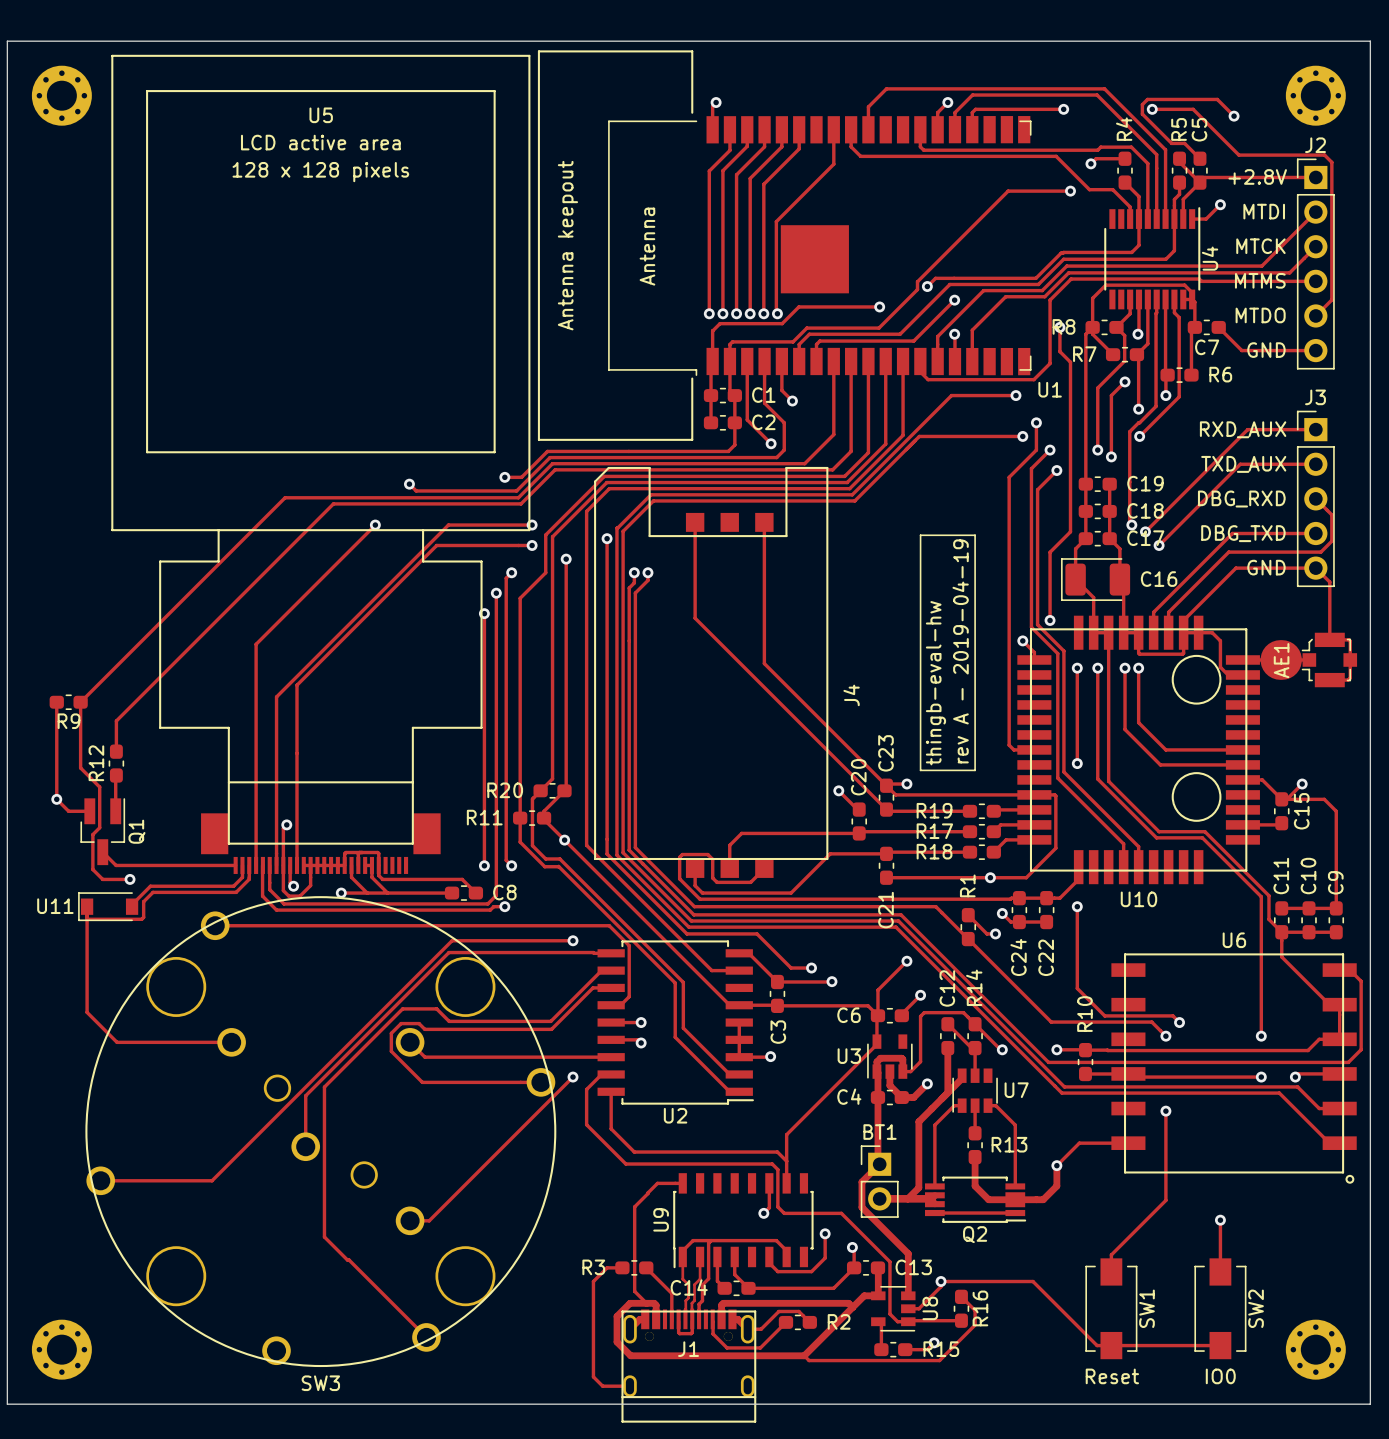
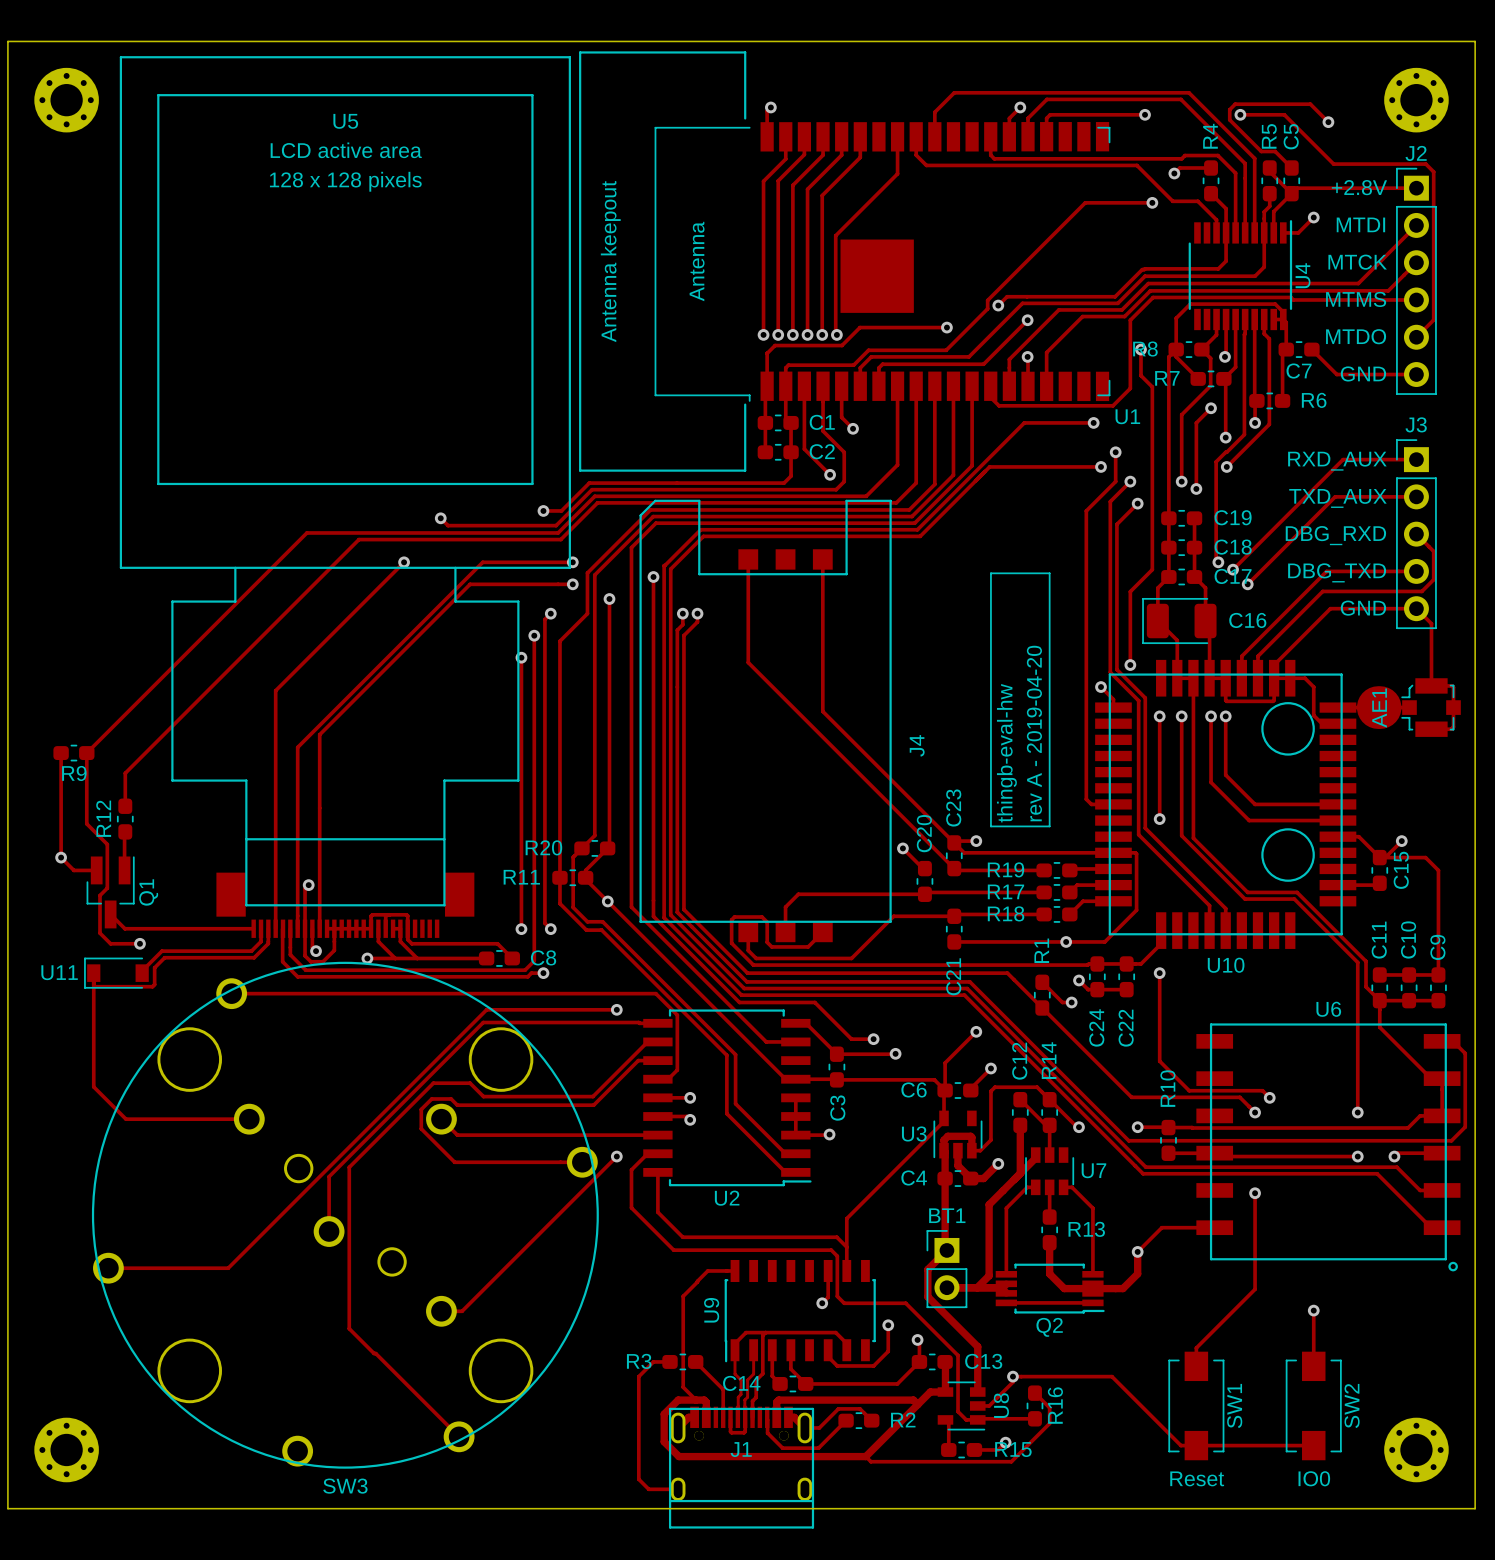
text: rev A - 2019-04-19 (960, 651) -> rev A - 2019-04-20 (1034, 733)

